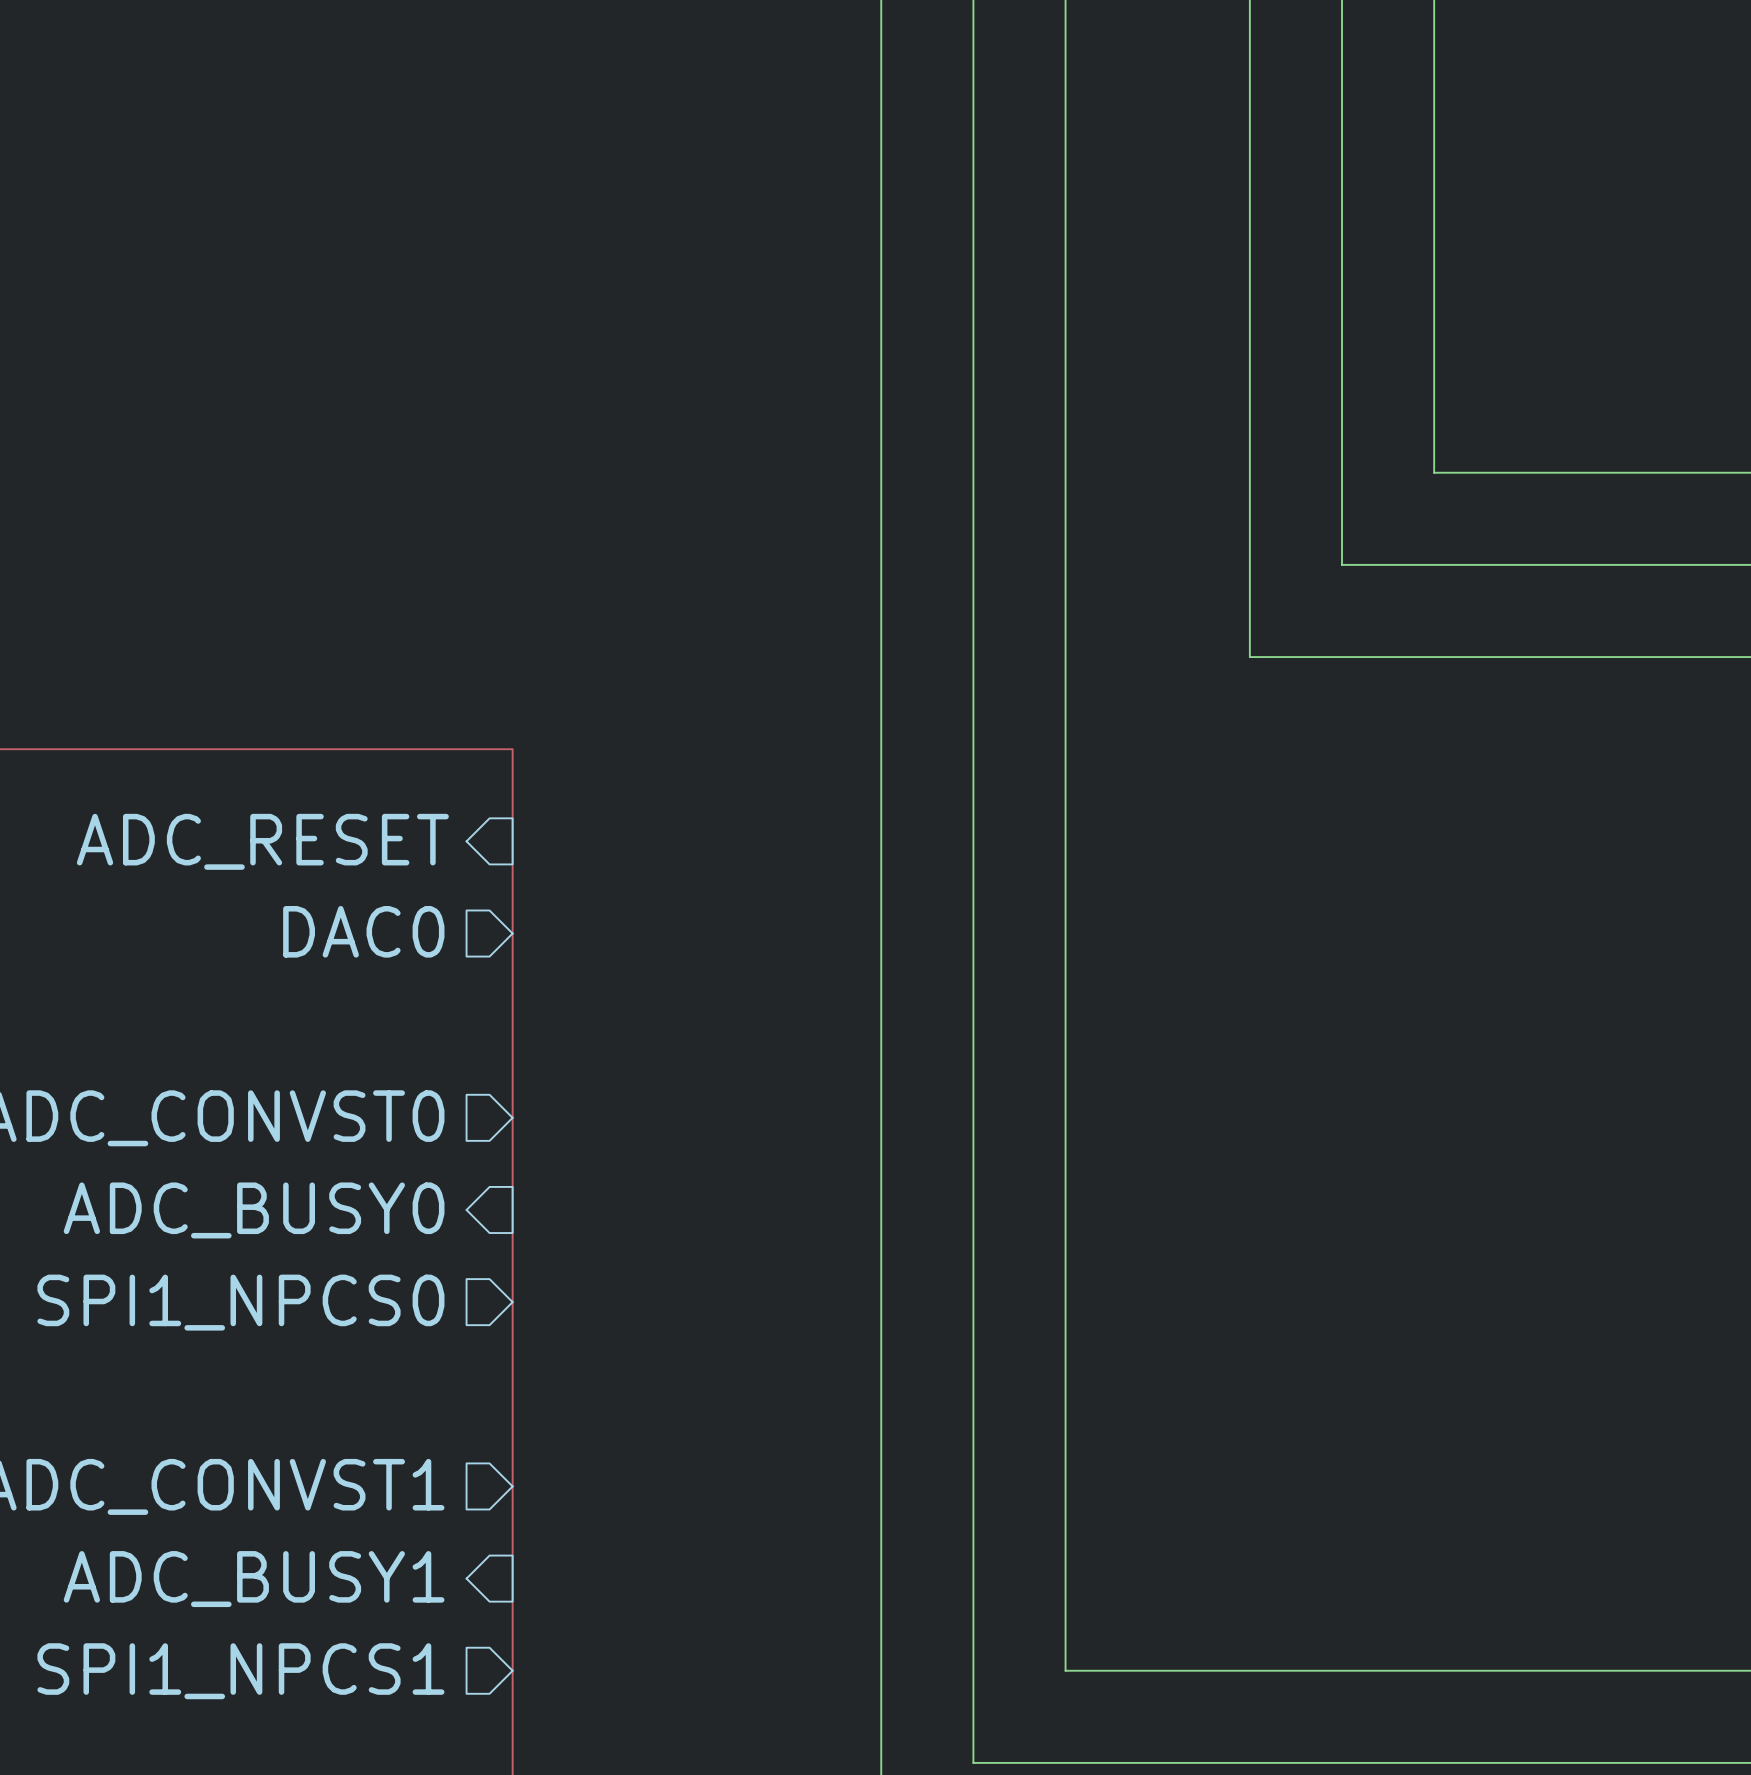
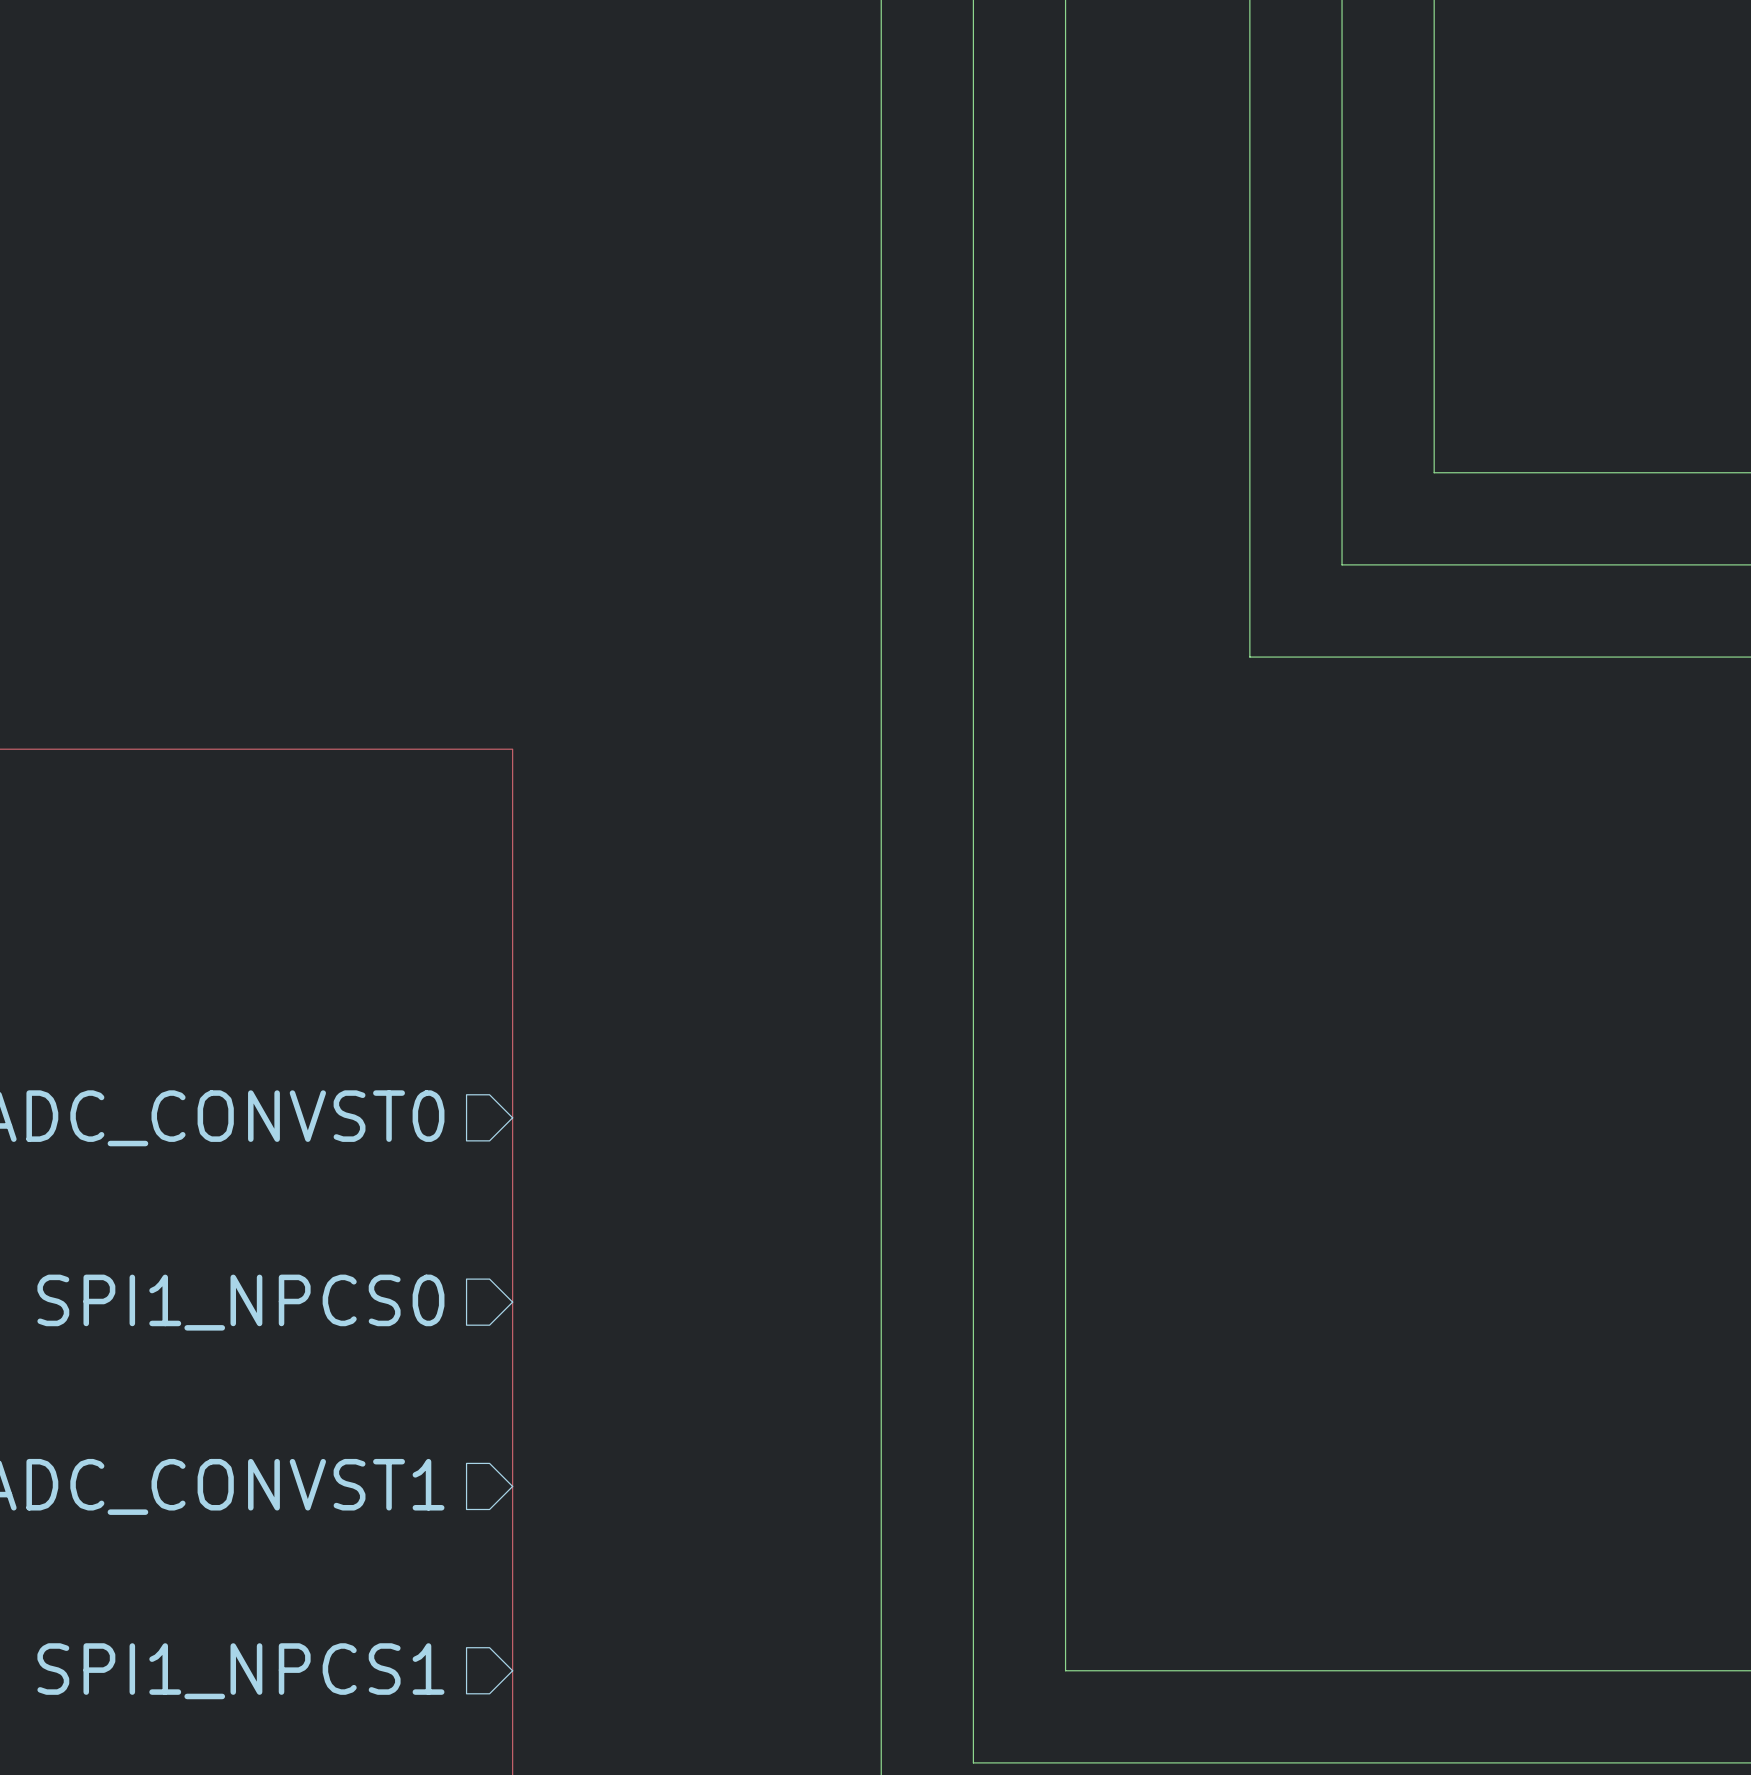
sheet pin: ADC_RESET (262, 841) -> none
sheet pin: DAC0 (363, 931) -> none
sheet pin: ADC_BUSY0 (254, 1210) -> none
sheet pin: ADC_BUSY1 (254, 1579) -> none

